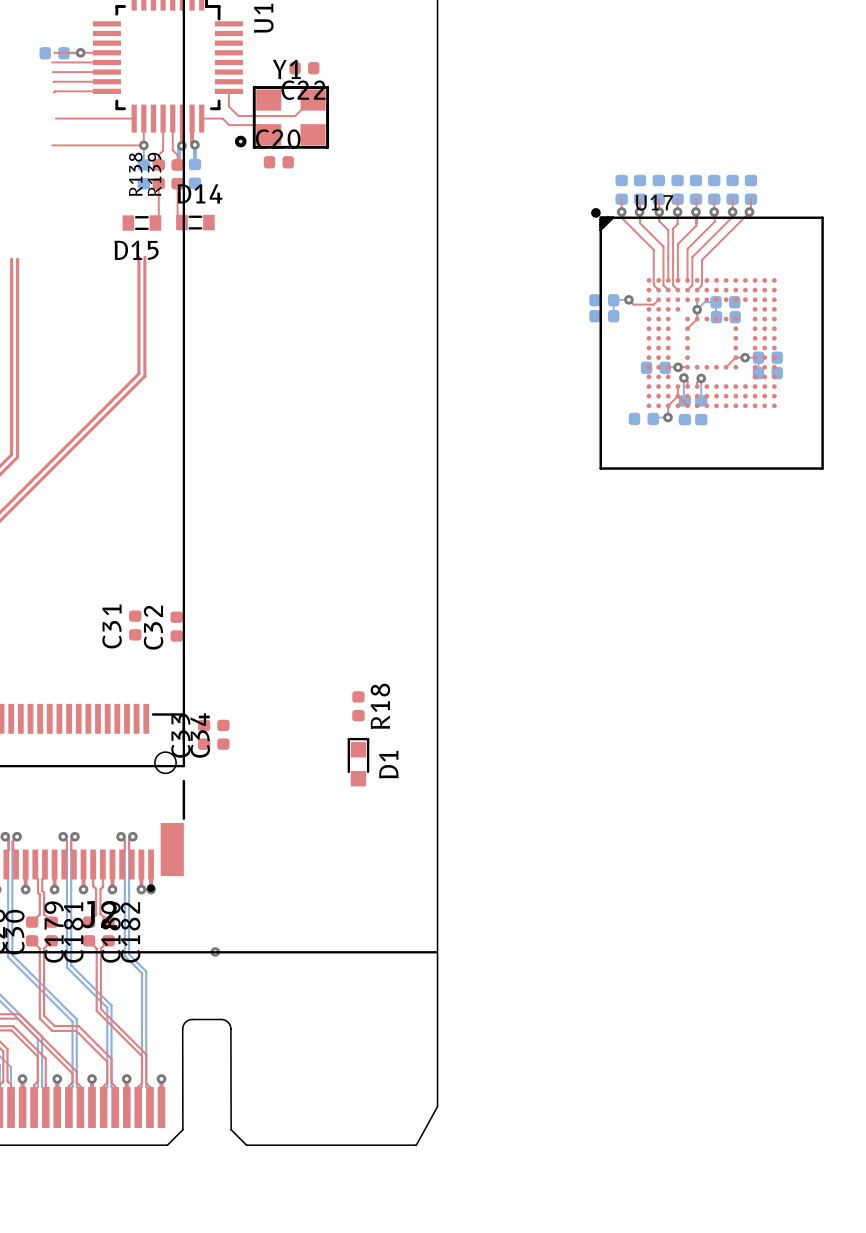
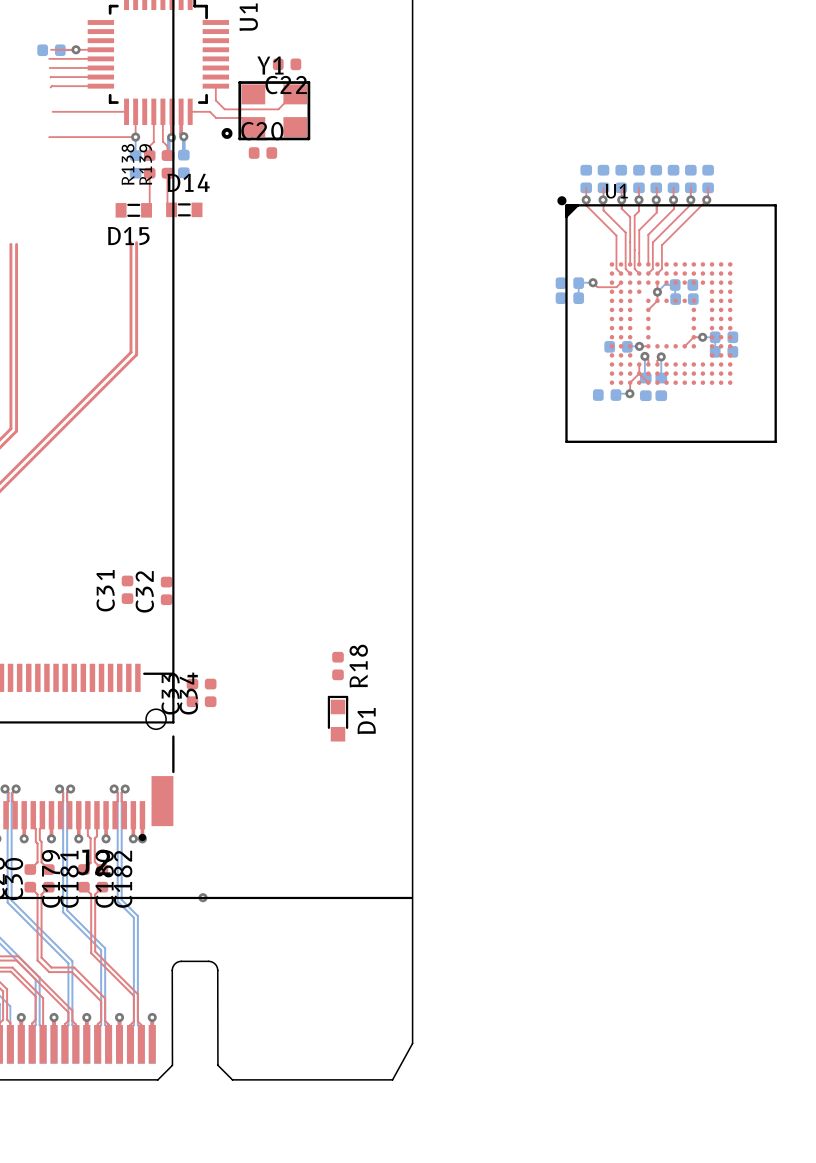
U17 name: U17 (654, 202) -> U1 (616, 191)

